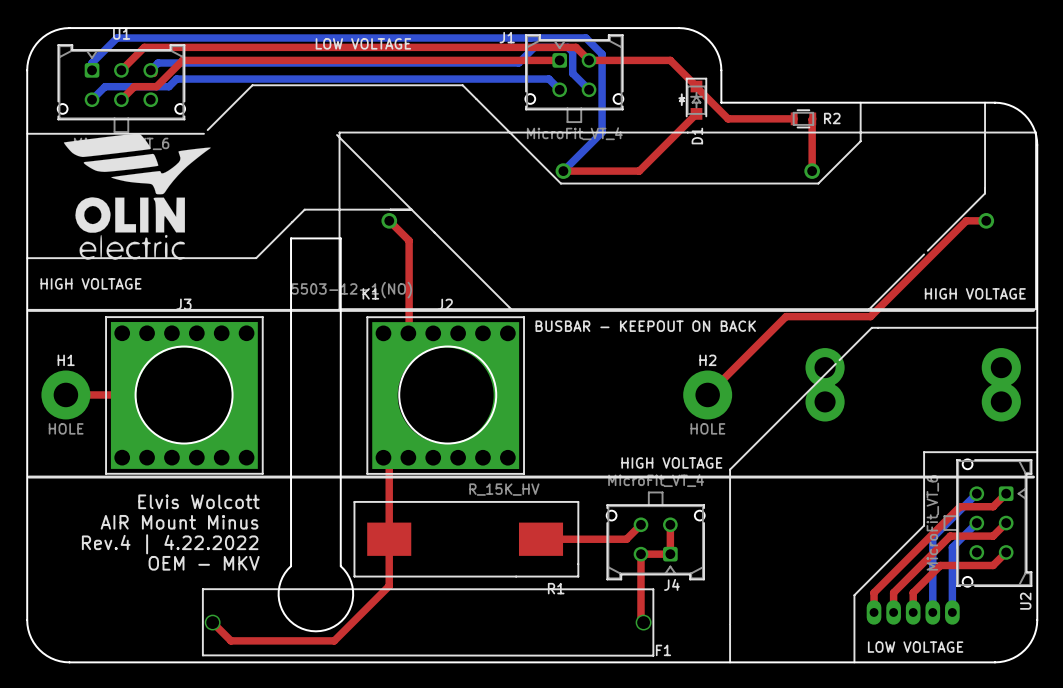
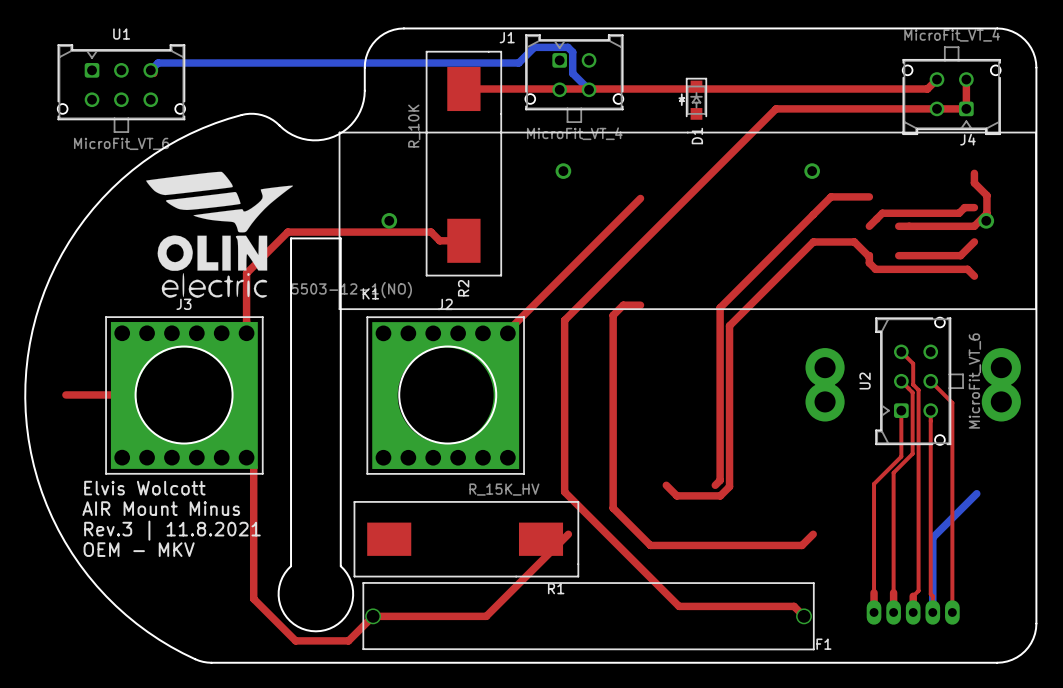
board edge: (69, 28) (683, 28) (693, 30) (705, 37) (717, 52) (721, 65) (721, 102) (994, 102) (1008, 105) (1017, 109) (1028, 118) (1033, 126) (1037, 144) (1037, 620) (1036, 629) (1030, 642) (1021, 653) (1013, 658) (994, 662) (69, 662) (60, 661) (46, 655) (33, 642) (29, 634) (27, 620) (27, 70) (29, 56) (39, 40) (55, 30) (69, 28) -> none
board edge: none -> (403, 28) (997, 28)
board edge: none -> (403, 28) (384, 33) (370, 48) (365, 62) (364, 90)
board edge: none -> (997, 28) (1012, 31) (1024, 39) (1033, 52) (1036, 67) (1036, 623) (1033, 638) (1024, 651) (1016, 657) (1002, 662) (207, 662) (195, 659) (170, 646) (126, 615) (97, 586) (72, 553) (52, 517) (33, 465) (26, 425) (26, 370) (32, 330) (49, 278) (76, 230) (102, 198) (132, 170) (166, 146) (202, 128) (249, 113) (269, 118) (287, 132) (302, 138) (318, 140) (328, 138) (343, 131) (354, 120) (362, 106) (364, 90)
bottom track: (530, 37) (585, 37) (602, 54) (602, 132) (563, 171) (565, 171) -> none
bottom track: (530, 38) (117, 38) (92, 63) (92, 70) -> none
text: LOW VOLTAGE (363, 43) -> none
top track: (559, 60) (182, 60) (156, 86) (134, 86) (121, 99) -> none
top track: (121, 70) (144, 47) (576, 47) (589, 60) (670, 60) (728, 118) (794, 118) -> none
top track: none -> (937, 79) (927, 89) (463, 89)
top track: none -> (966, 79) (966, 108) (776, 108) (564, 320) (564, 491) (679, 606) (794, 606) (804, 616)
bottom track: (559, 89) (548, 79) (176, 79) (168, 86) (105, 86) (92, 99) -> none
line: (860, 102) (860, 141) (818, 183) (560, 183) (462, 85) (252, 85) (207, 130) -> none
line: (985, 102) (985, 193) (927, 250) -> none
R2 footprint: [790, 109, 817, 129] -> [426, 51, 502, 277]
top track: (696, 113) (639, 171) (563, 171) -> none
top track: (812, 118) (812, 171) -> none
R2 name position: R2 (832, 118) -> R2 (463, 288)
R2 value: none -> R_10K (414, 126)
line: (27, 133) (203, 133) -> none
line: (337, 135) (511, 309) -> none
top track: none -> (974, 173) (974, 183) (986, 195) (986, 213) (974, 226) (898, 226)
drawing position: (137, 196) -> (219, 234)
top track: none -> (869, 196) (831, 196) (720, 307) (720, 480) (715, 485)
top track: none -> (640, 198) (507, 331) (507, 333)
top track: none -> (974, 207) (964, 207) (959, 213) (882, 213) (869, 226)
line: (411, 209) (304, 209) (256, 258) (27, 258) -> none
top track: (389, 220) (409, 240) (409, 355) -> none
top track: (986, 220) (966, 220) (870, 316) (786, 316) (707, 394) -> none
top track: none -> (463, 240) (439, 240) (431, 232) (287, 232) (246, 273) (246, 333)
top track: none -> (974, 241) (960, 255) (898, 255)
line: (924, 254) (868, 310) -> none
top track: none -> (974, 276) (967, 269) (875, 269) (869, 263) (869, 255) (854, 241) (813, 241) (729, 325) (729, 486) (720, 495) (676, 495) (666, 485)
text: HIGH VOLTAGE (91, 283) -> none
text: HIGH VOLTAGE (975, 293) -> none
top track: none -> (640, 305) (623, 305) (613, 315) (613, 508) (650, 545) (802, 545) (813, 534)
line: (28, 310) (1033, 310) -> none
text: BUSBAR - KEEPOUT ON BACK (645, 326) -> none
line: (1037, 327) (871, 327) (839, 360) -> none
line: (835, 363) (730, 469) (730, 623) -> none
top track: none -> (930, 381) (952, 402) (952, 612)
H1: HOLE (65, 394) -> none
H2: HOLE (707, 394) -> none
top track: none -> (930, 410) (930, 594) (932, 596) (932, 612)
line: (1037, 452) (924, 452) (924, 525) (854, 595) (854, 662) -> none
top track: (383, 457) (389, 463) (389, 585) (334, 640) -> (568, 534) (486, 616) (373, 616) (348, 640) (334, 640)
text: HIGH VOLTAGE (671, 463) -> none
line: (28, 477) (1033, 477) -> none
top track: (1006, 493) (993, 506) (960, 506) (874, 592) -> (901, 410) (901, 456) (874, 483) (874, 592)
text position: Elvis Wolcott (198, 501) -> Elvis Wolcott (144, 488)
text position: AIR Mount Minus (179, 522) -> AIR Mount Minus (161, 508)
bottom track: (976, 523) (952, 547) (952, 612) -> none
U2 rotation: 0° (988, 523) -> 180° (919, 381)
U2 position: (988, 523) -> (919, 381)
top track: (1006, 523) (993, 536) (950, 536) (893, 592) -> (901, 381) (912, 392) (912, 453) (893, 472) (893, 592)
top track: (640, 524) (626, 539) (541, 539) -> none
top track: (670, 524) (670, 554) (640, 554) (640, 619) (643, 622) -> none
J4 position: (655, 536) -> (951, 90)
text: Rev.4 | 4.22.2022 (170, 544) -> Rev.3 | 11.8.2021 (172, 530)
top track: (1006, 552) (993, 565) (940, 565) (913, 592) (913, 596) -> (901, 351) (913, 363) (913, 384) (918, 390) (918, 590) (913, 596)
text position: OEM - MKV (204, 563) -> OEM - MKV (139, 549)
U2 name position: U2 (1025, 601) -> U2 (865, 381)
top track: (212, 622) (230, 640) (295, 640) -> (220, 434) (253, 467) (253, 598) (295, 640)
F1 position: (428, 622) -> (588, 616)
line: (730, 625) (730, 662) -> none
text: LOW VOLTAGE (915, 647) -> none

